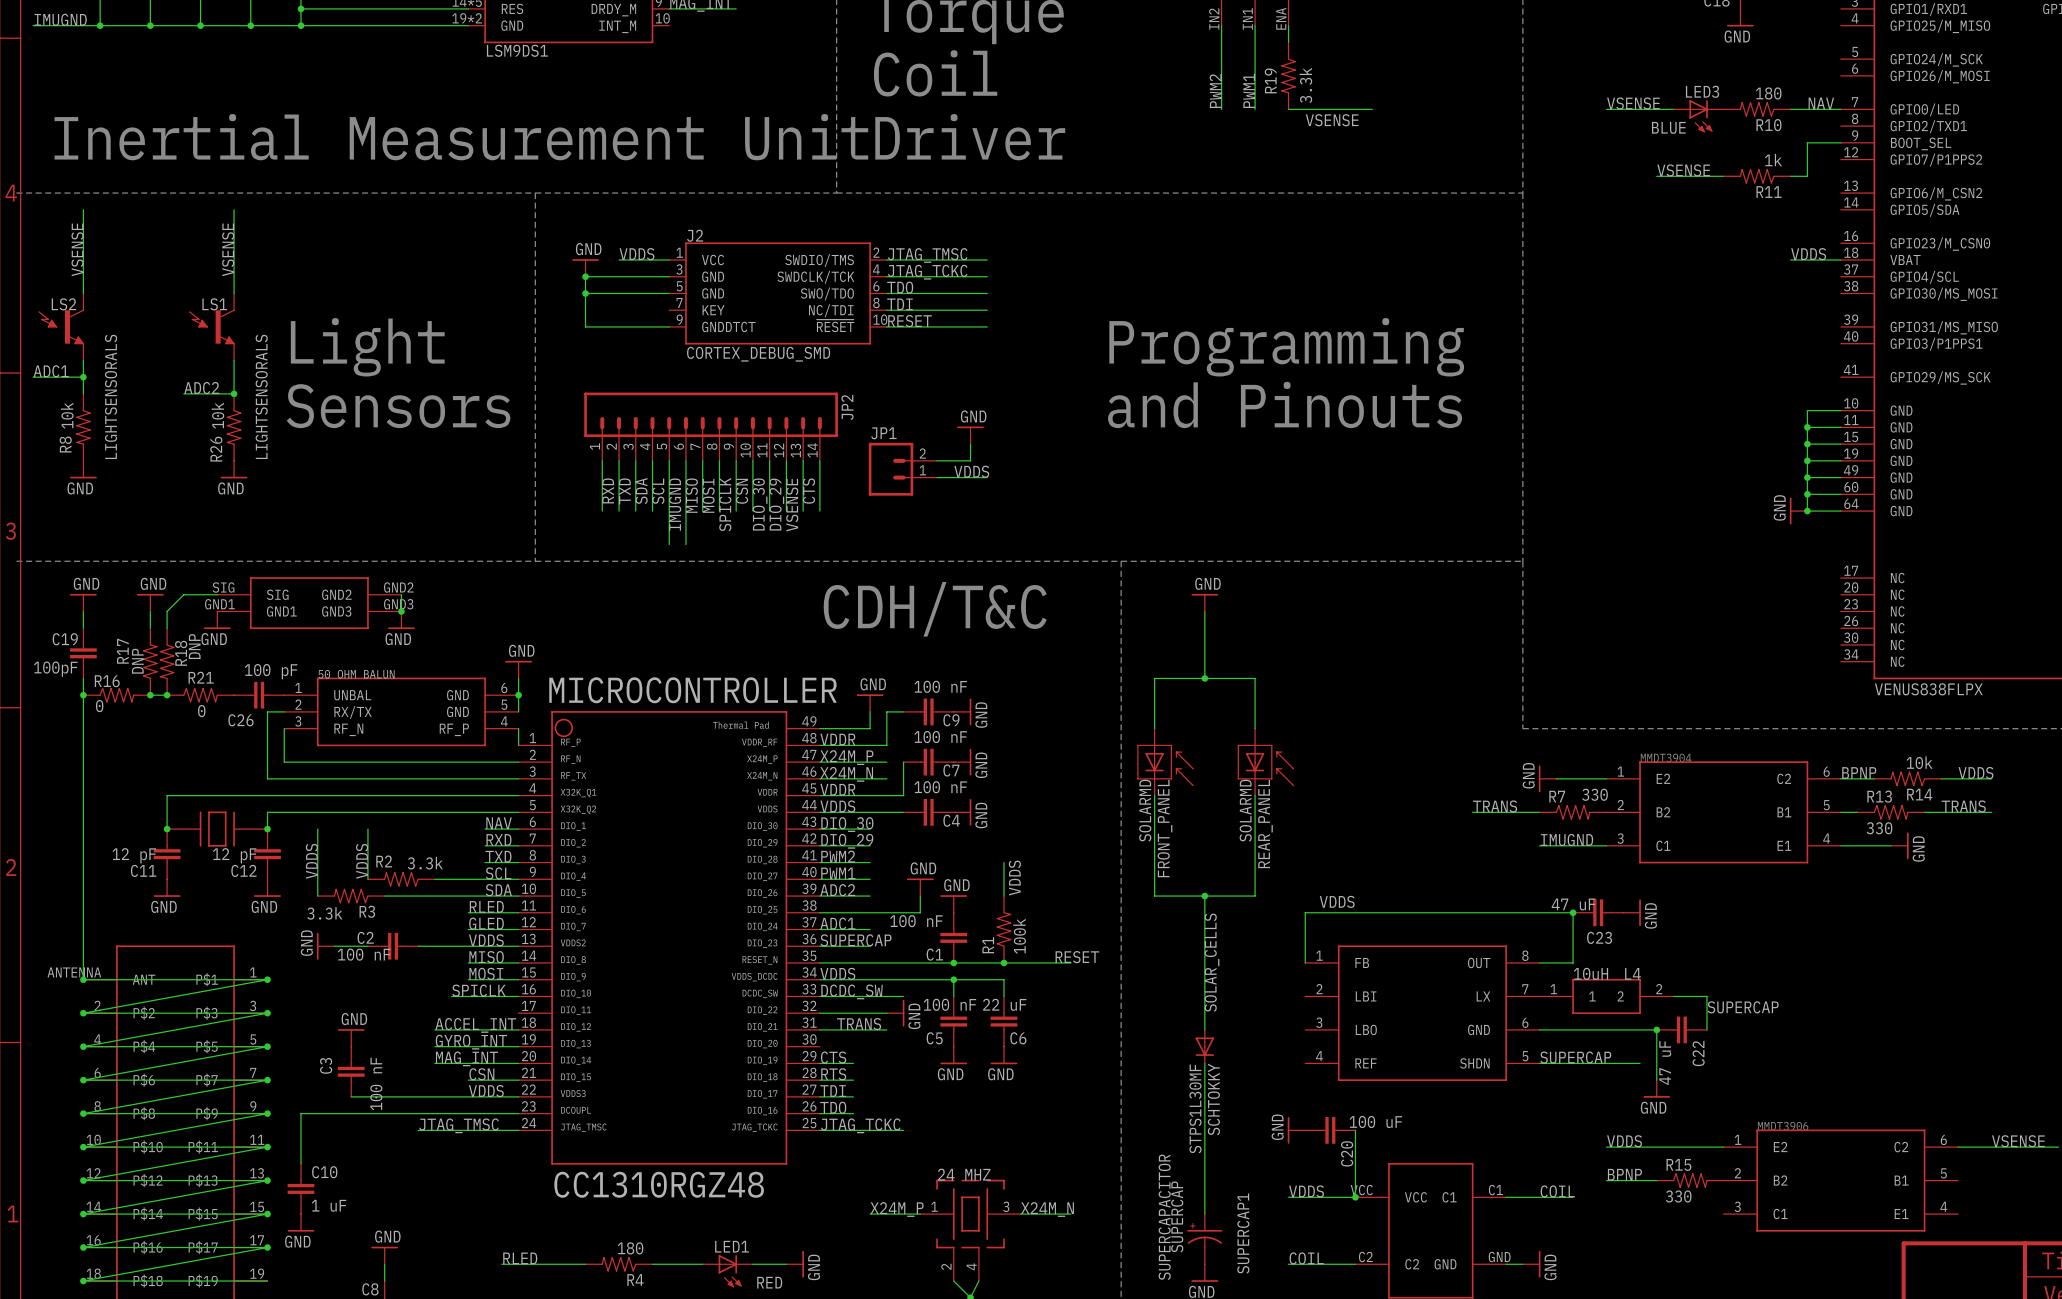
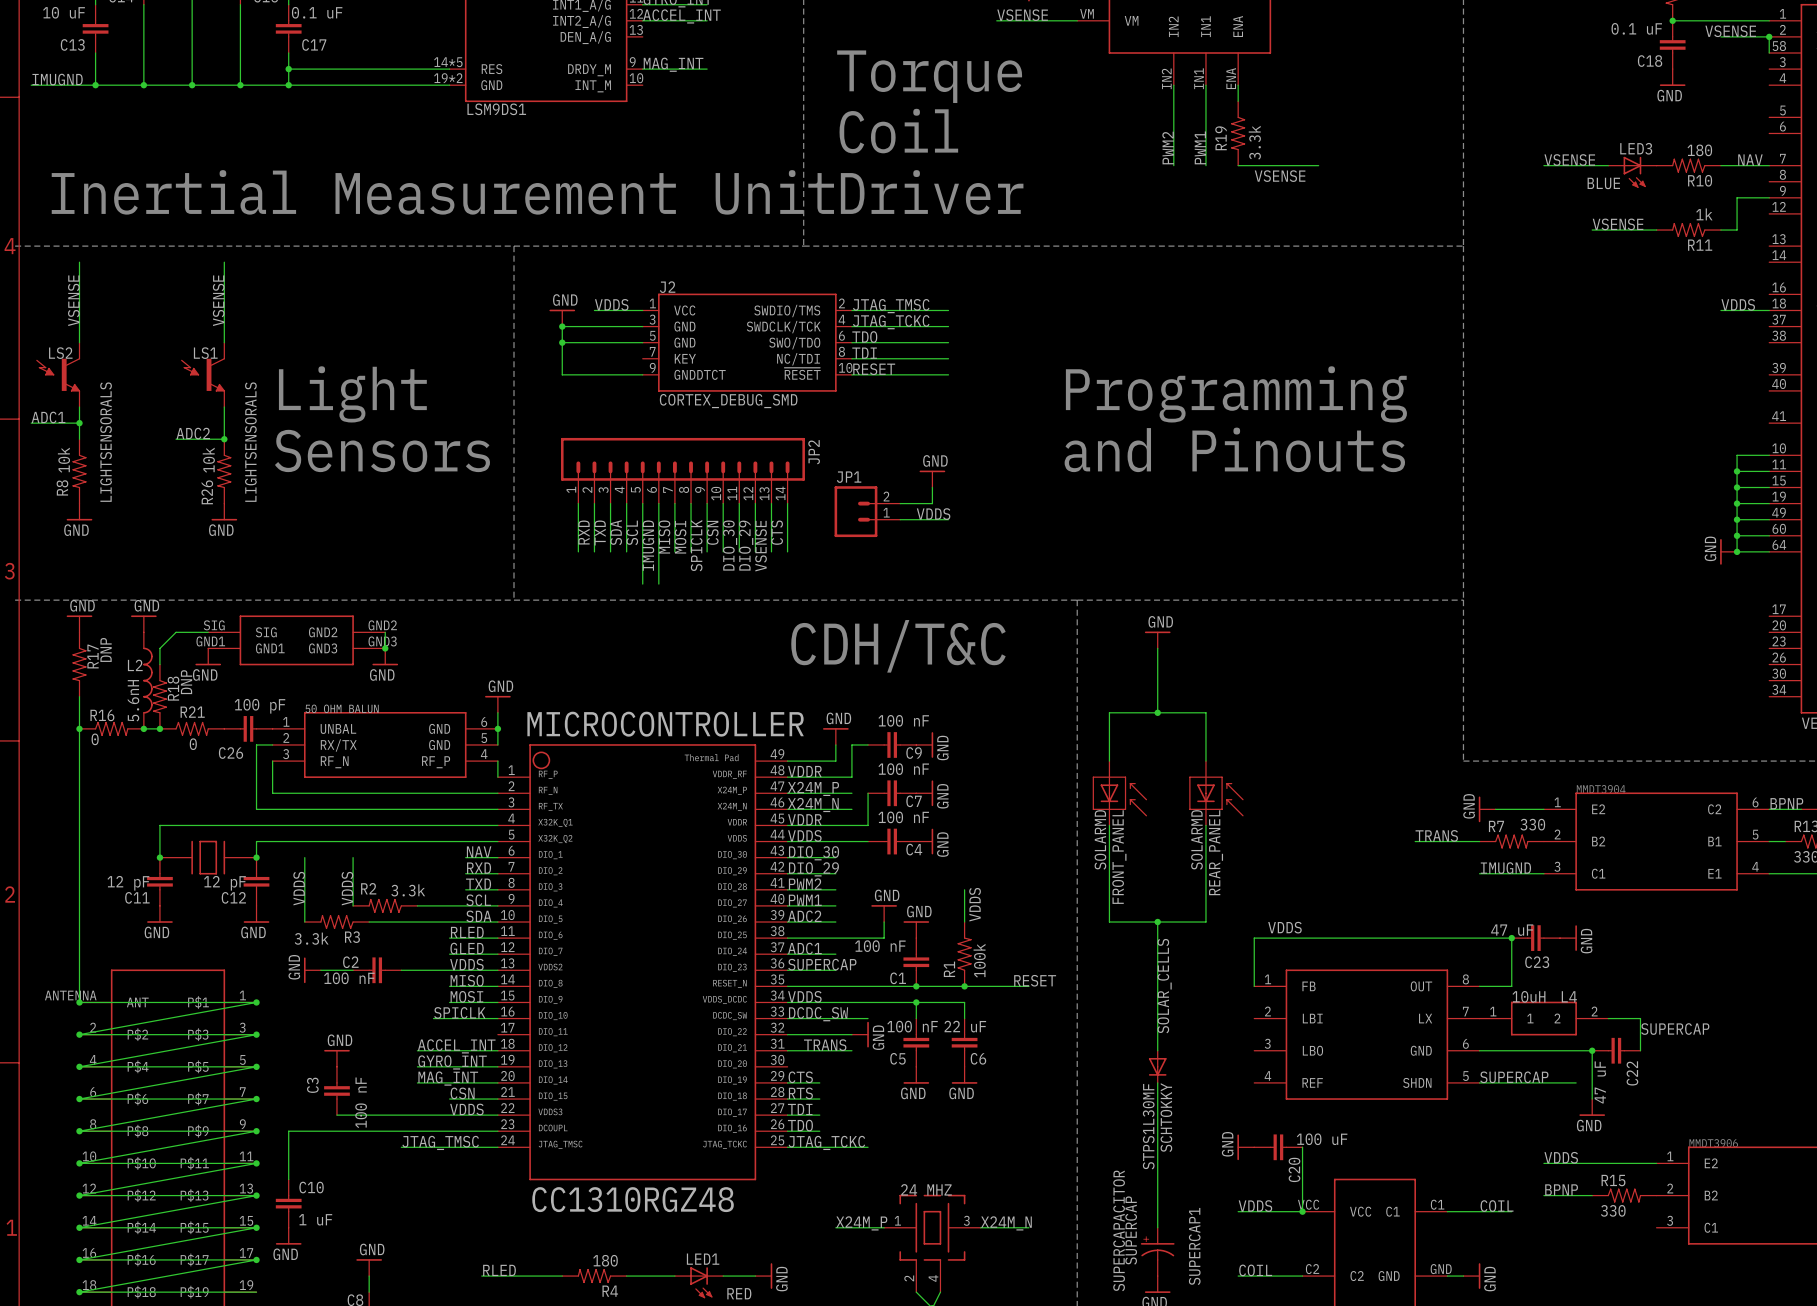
power symbol position: GND (83, 602) -> GND (79, 623)
power symbol position: GND (150, 602) -> GND (143, 623)
wire: (150, 611) (150, 628) -> none
L2: none -> 5.6nH (147, 680)
R17 name position: R17 (122, 651) -> R17 (93, 656)
C19: 100pF (83, 653) -> none
R17 value position: DNP (137, 661) -> DNP (106, 649)
R17 rotation: 0° (150, 661) -> 180° (79, 664)
R17 position: (150, 661) -> (79, 664)

